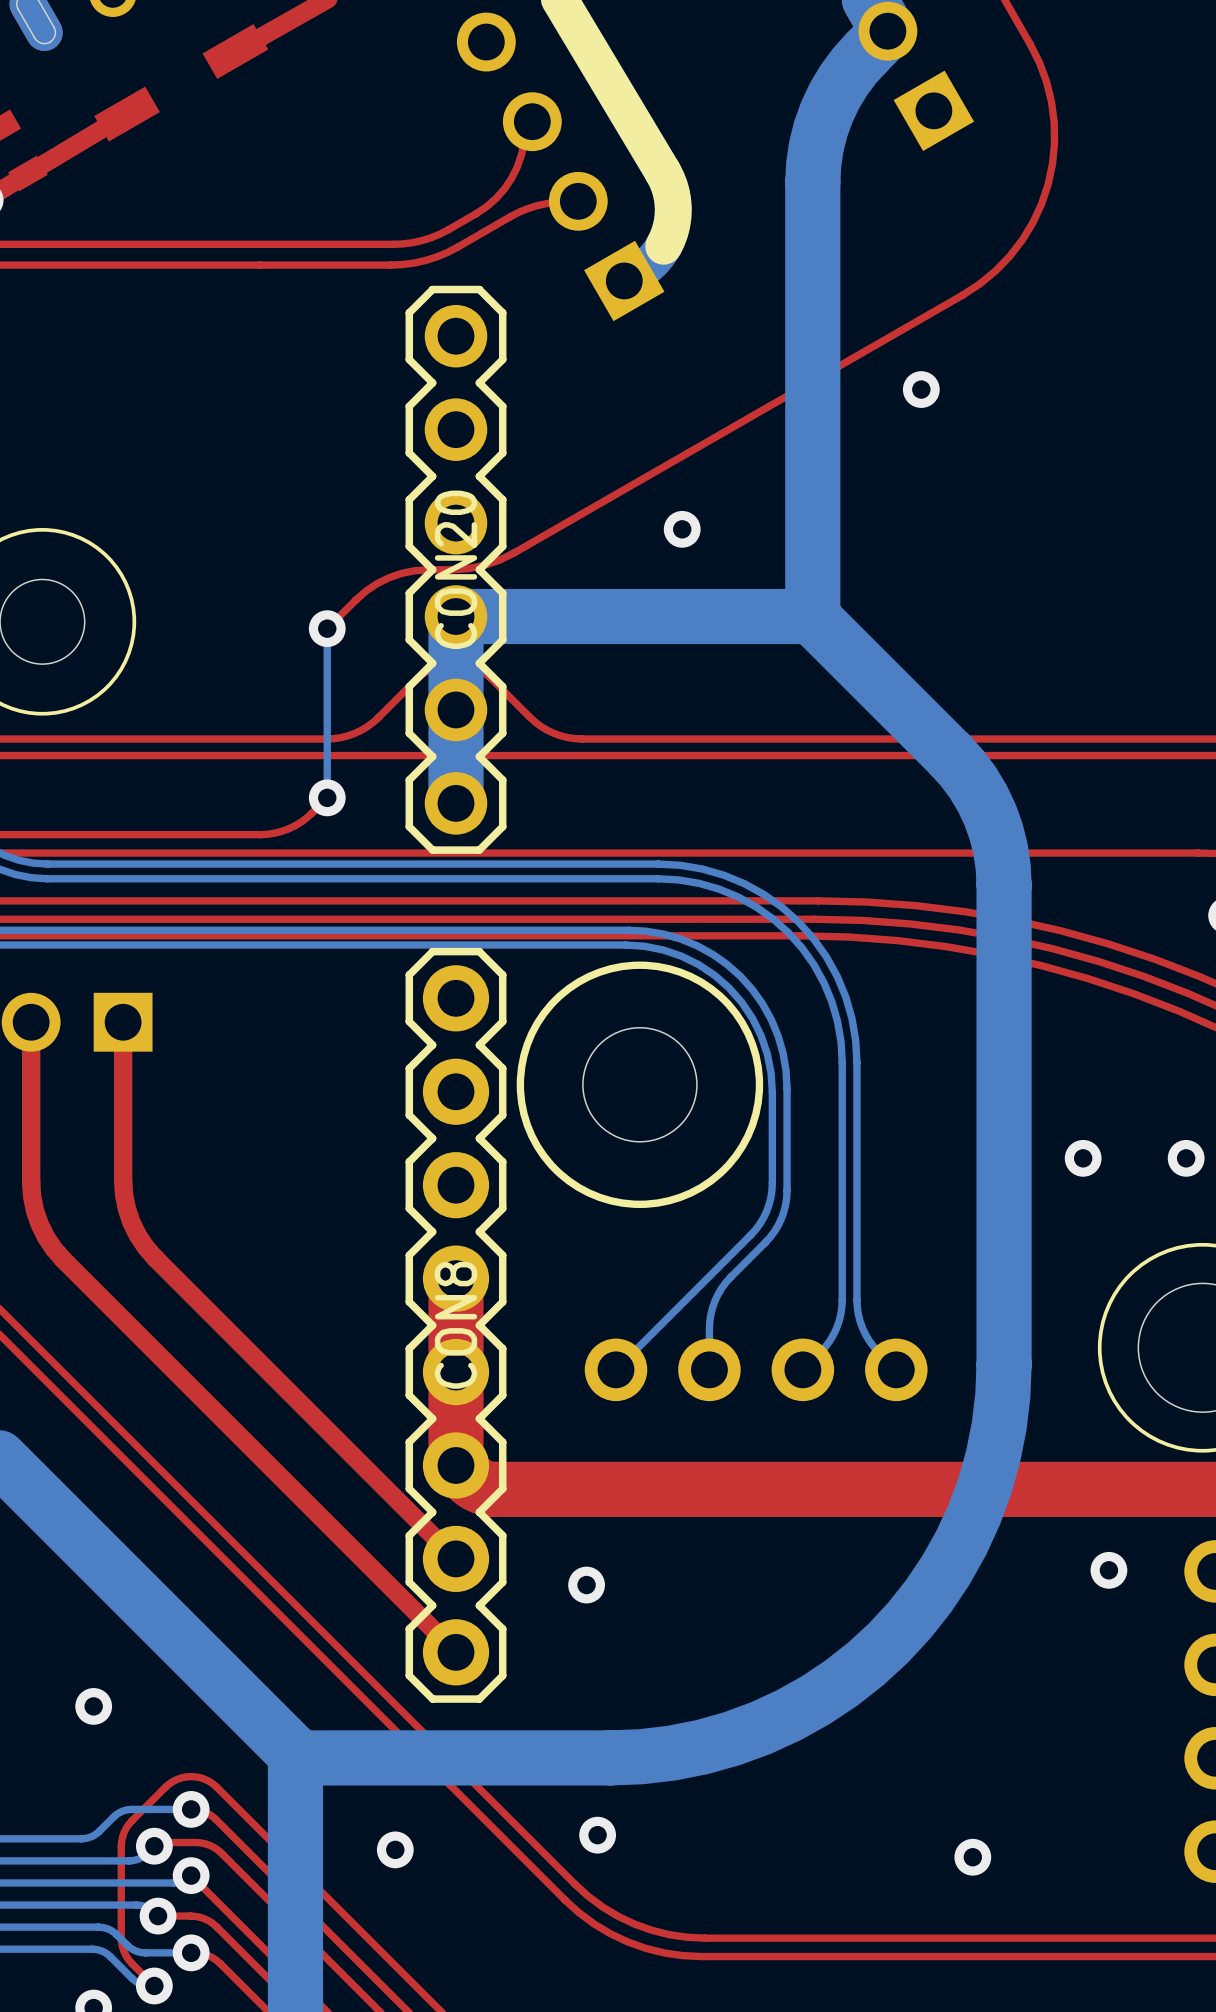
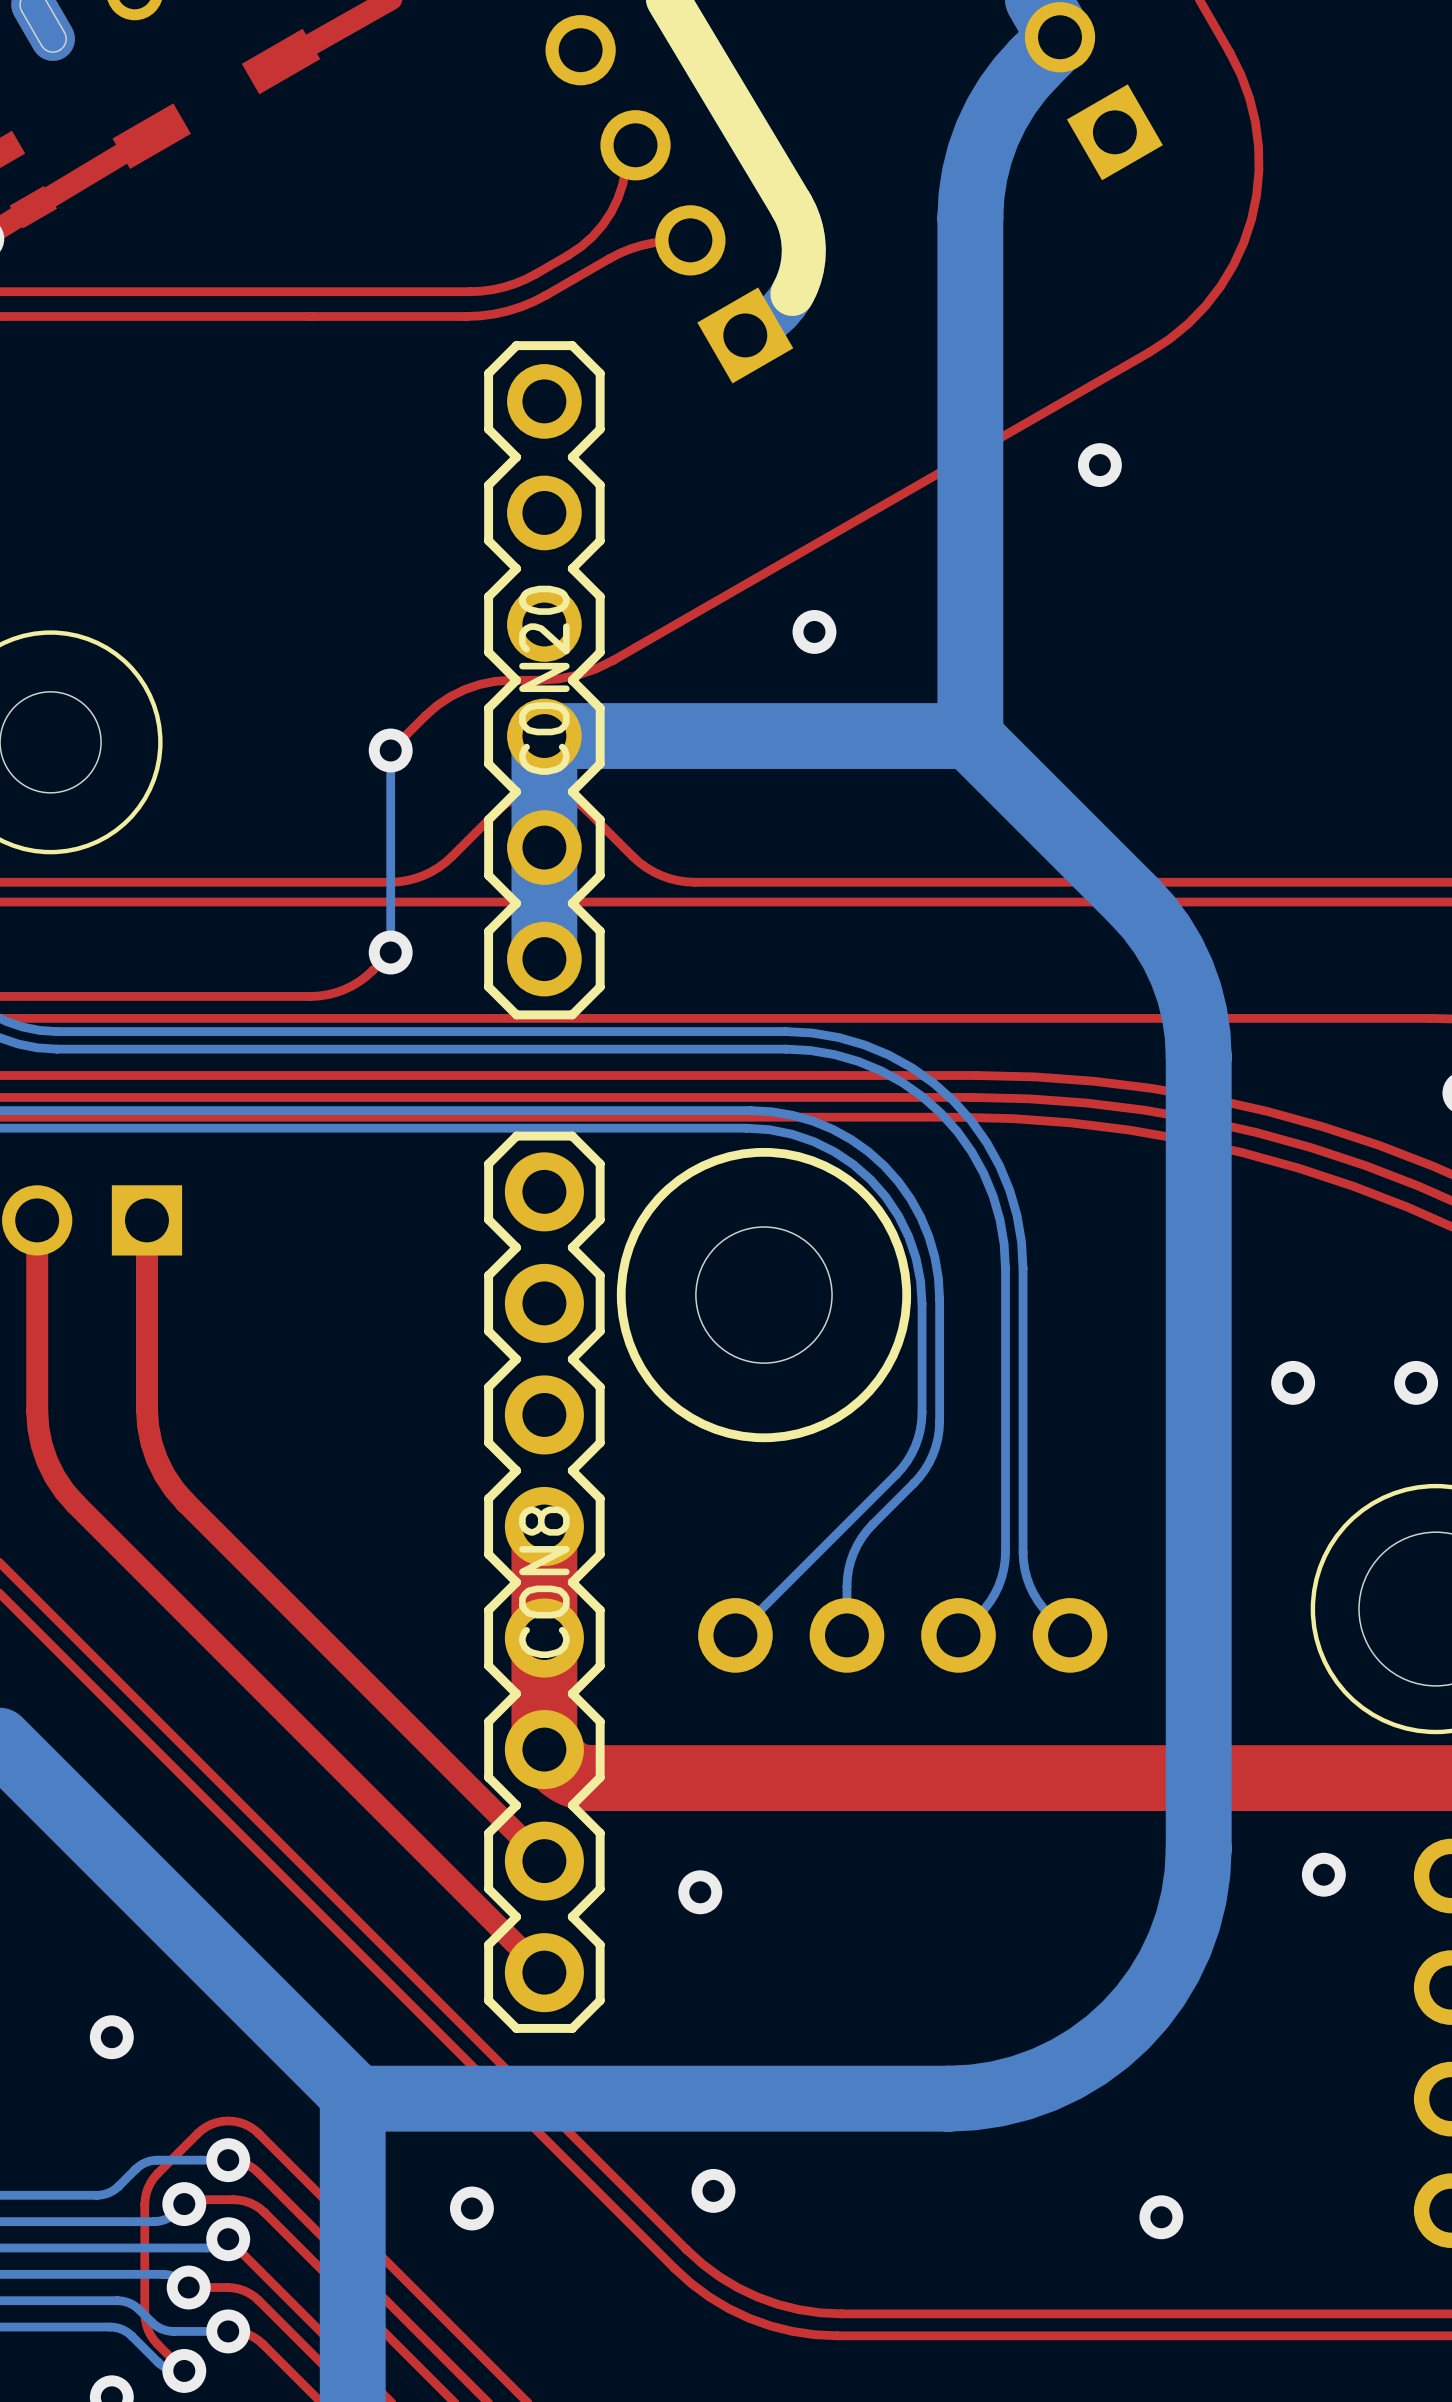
bottom track: (1004, 1364) (999, 1425) (984, 1485) (974, 1514) (946, 1569) (909, 1619) (888, 1642) (841, 1682) (789, 1715) (761, 1727) (732, 1738) (672, 1753) (610, 1757) -> (1198, 1628) (1198, 1848) (1193, 1897) (1179, 1944) (1169, 1966) (1141, 2007) (1125, 2025) (1107, 2041) (1066, 2069) (1021, 2087) (997, 2093) (948, 2098) (728, 2098)

